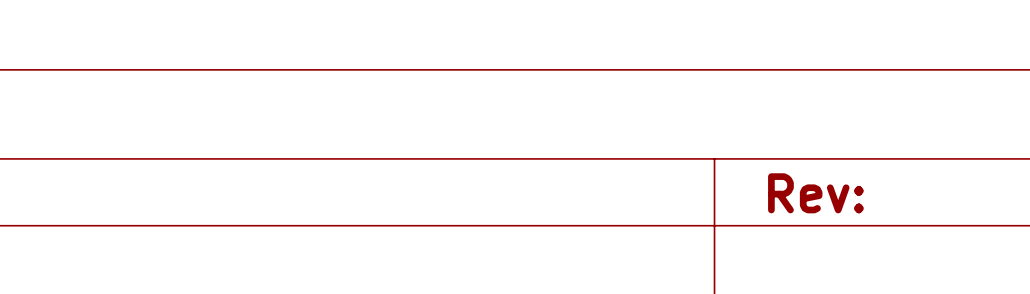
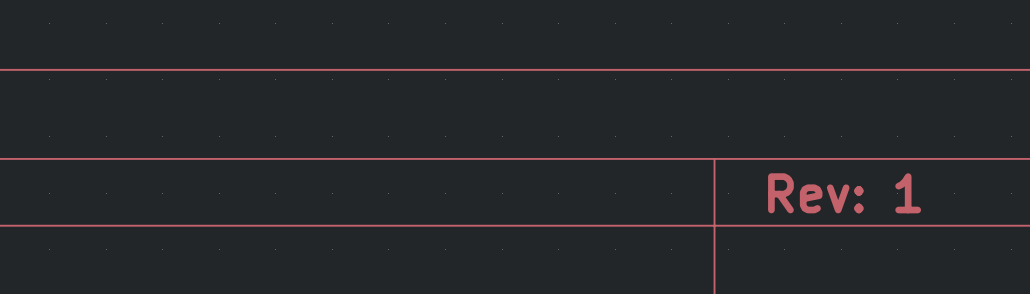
title block: Rev: (815, 193) -> Rev: 1 (844, 193)

